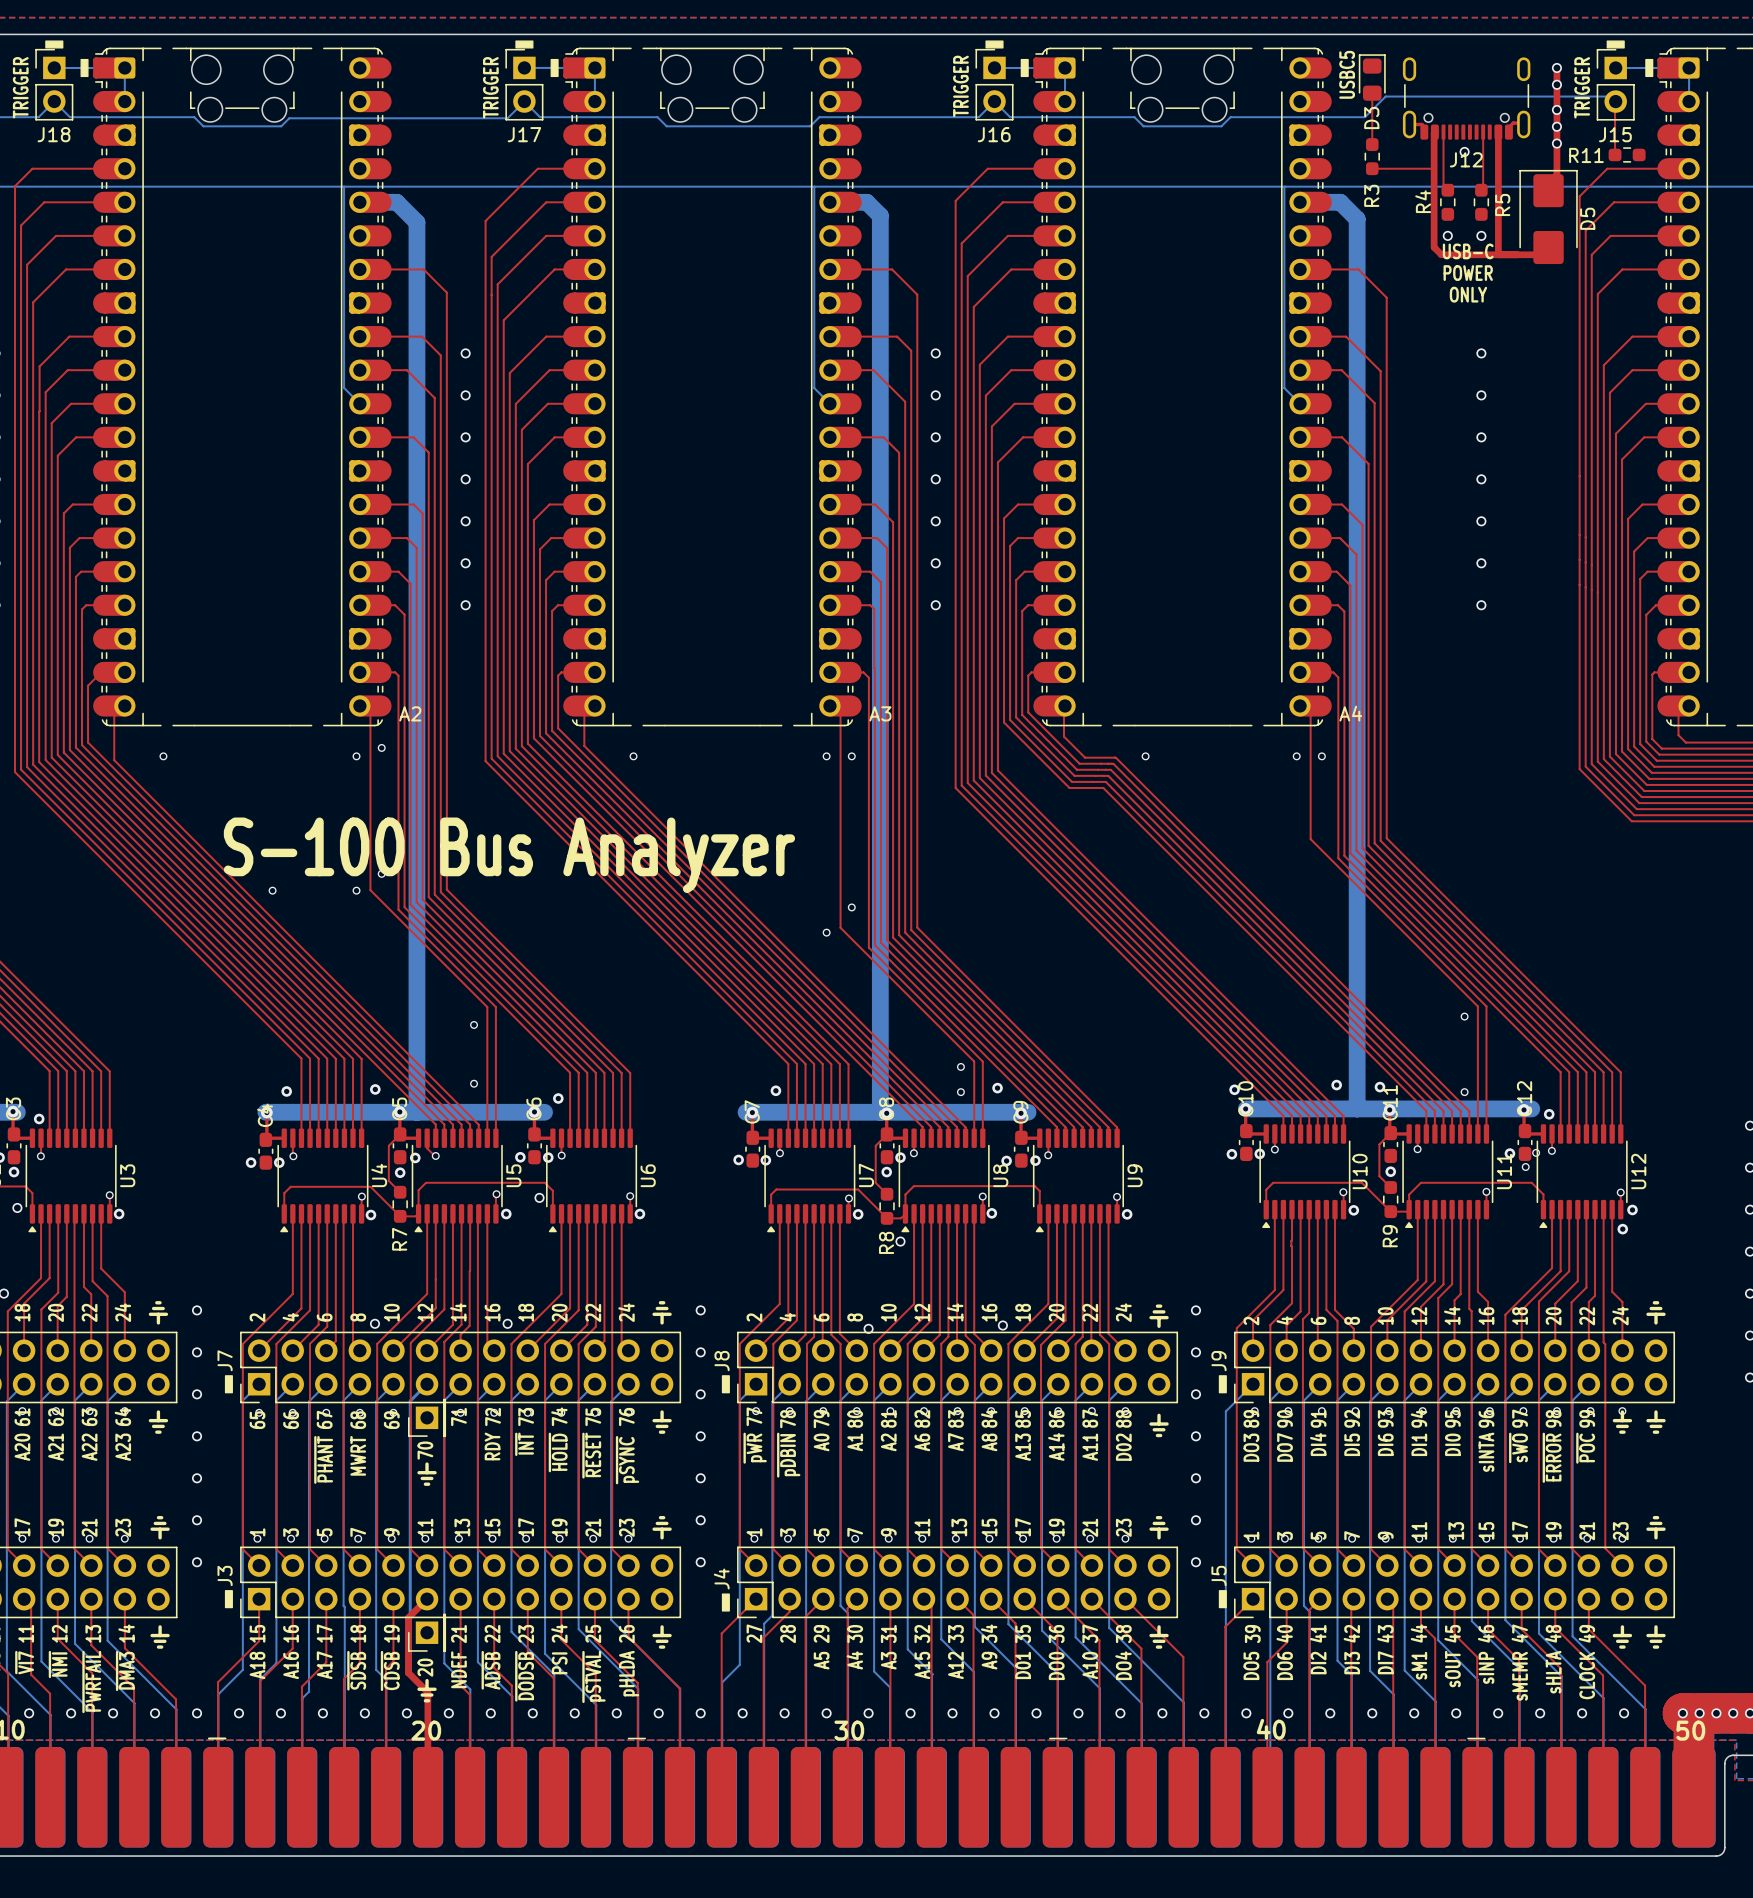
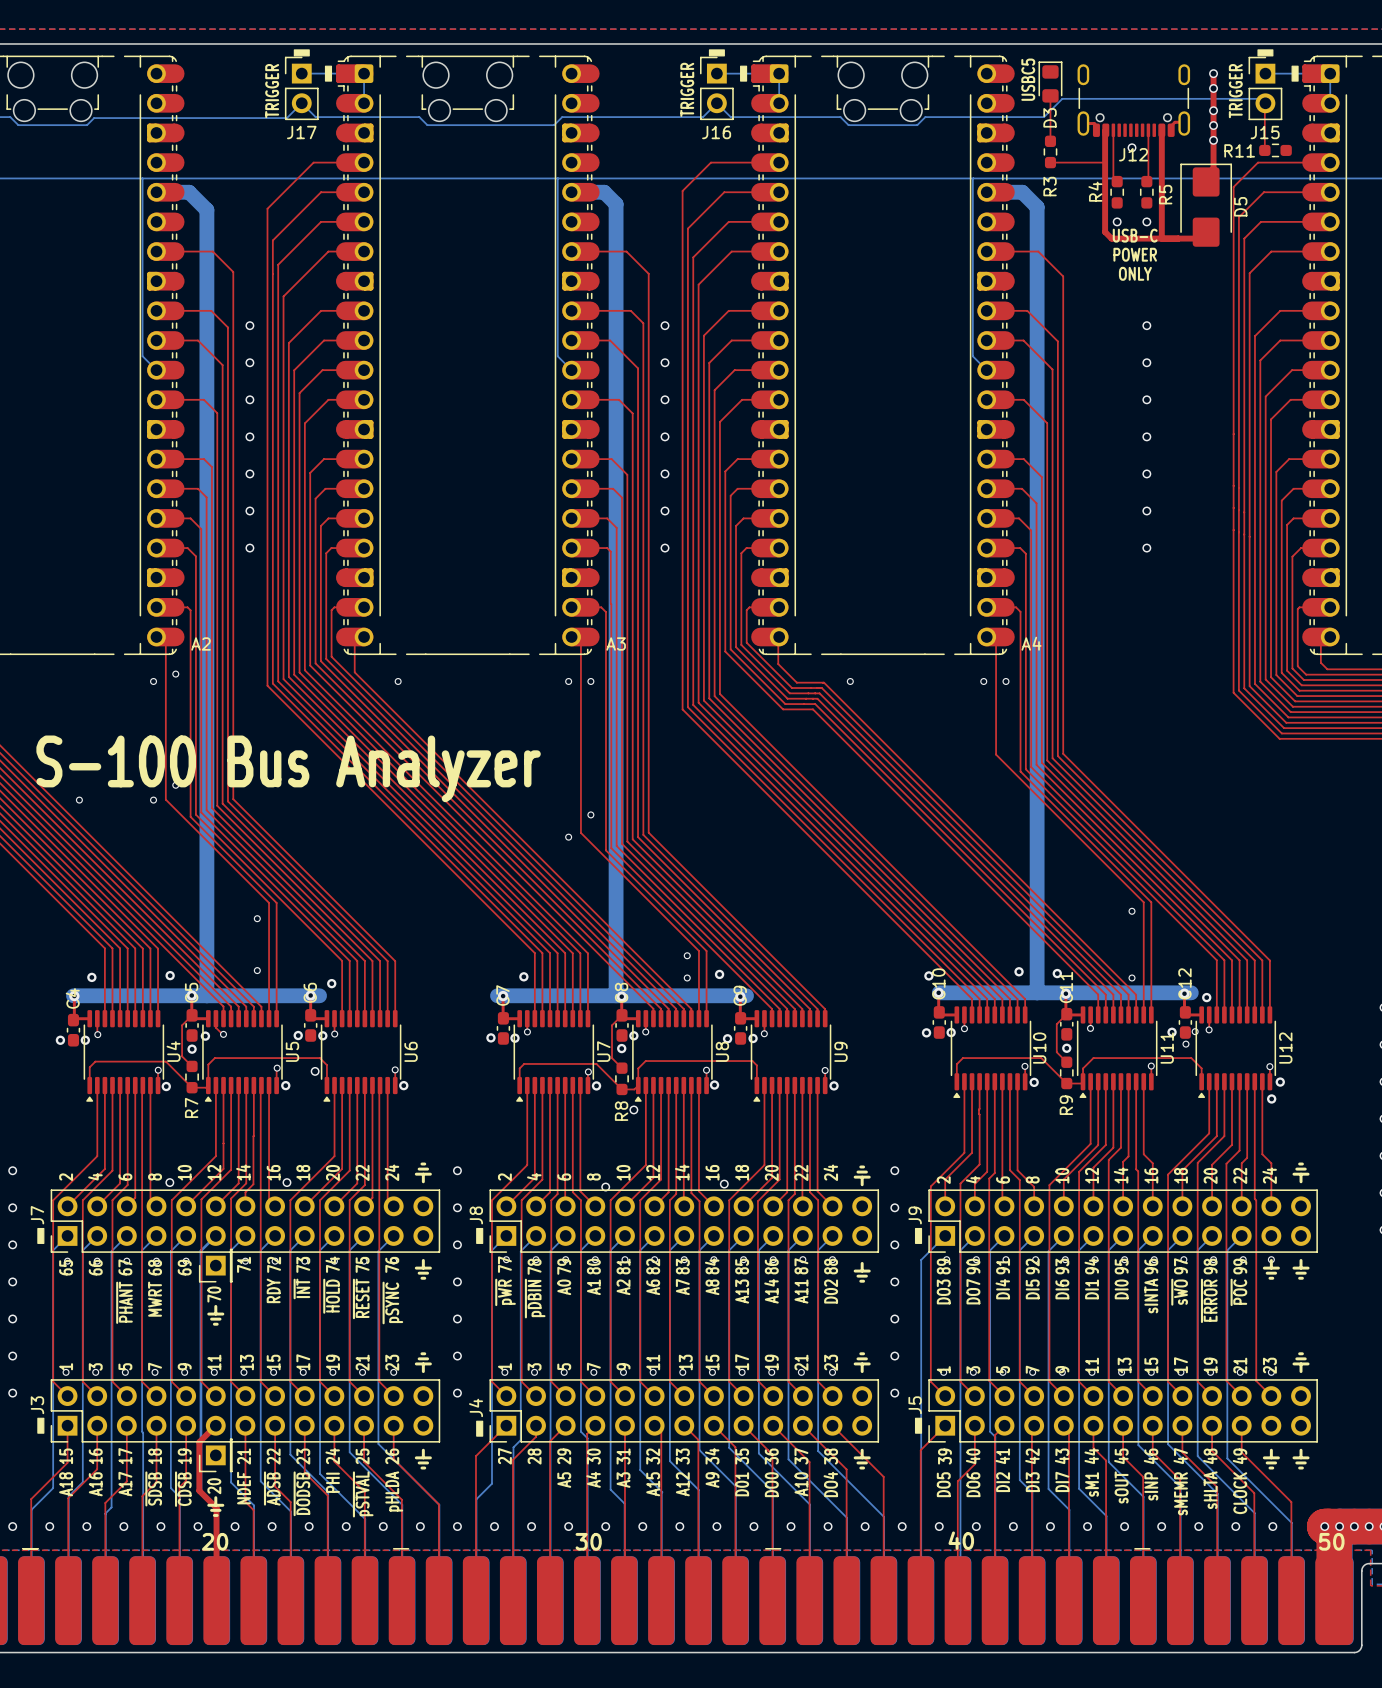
text: PSI (559, 1663) -> PHI (332, 1482)

